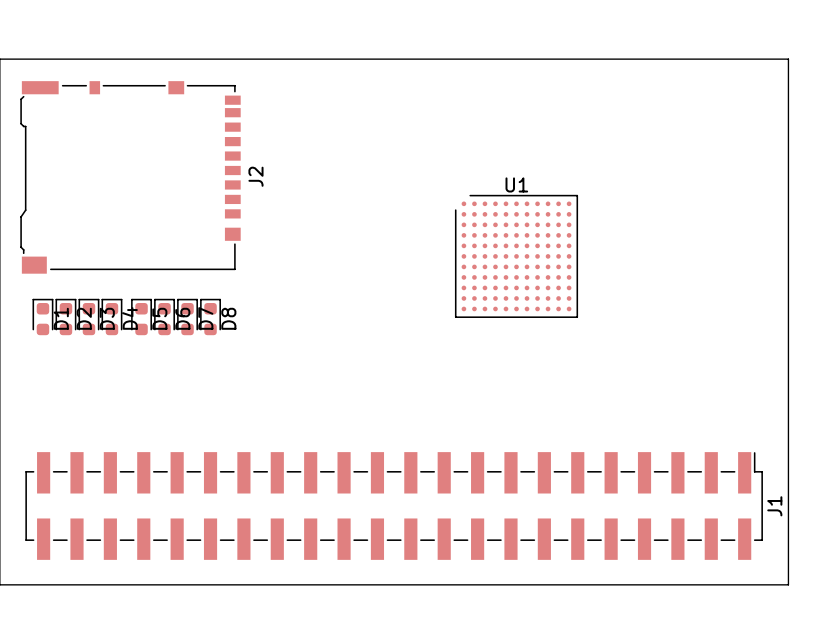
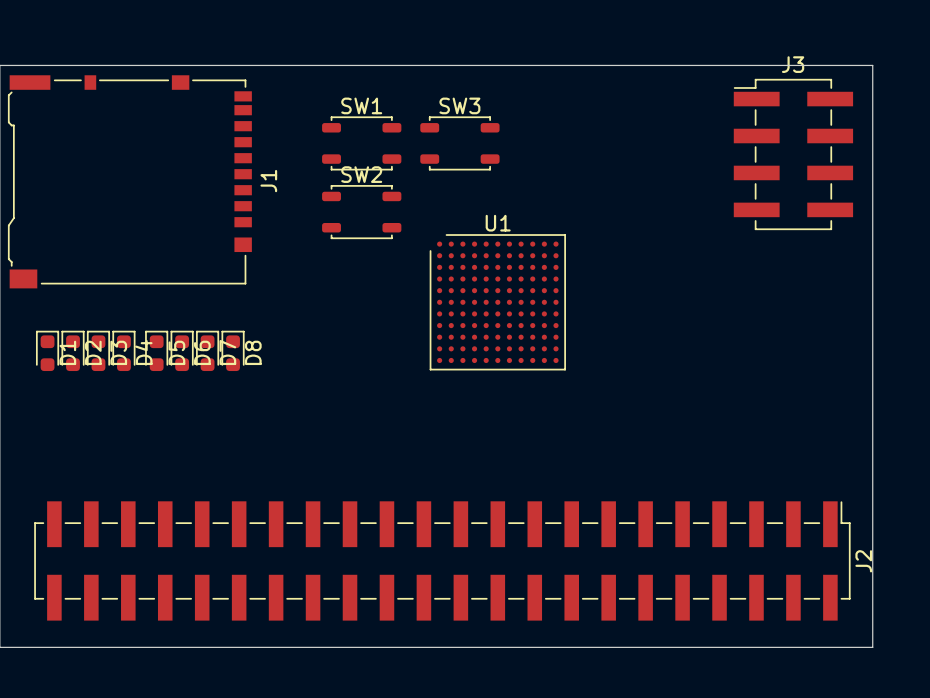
J2 footprint: [20, 81, 241, 274] -> [34, 501, 851, 621]
SW1: none -> (361, 143)
SW3: none -> (459, 143)
J3: none -> (793, 154)
J2 name position: J2 (255, 176) -> J2 (863, 561)
SW2: none -> (361, 212)
U1 position: (516, 256) -> (497, 302)
J1 footprint: [25, 452, 763, 560] -> [7, 75, 252, 289]
J1 name position: J1 (774, 506) -> J1 (268, 181)

